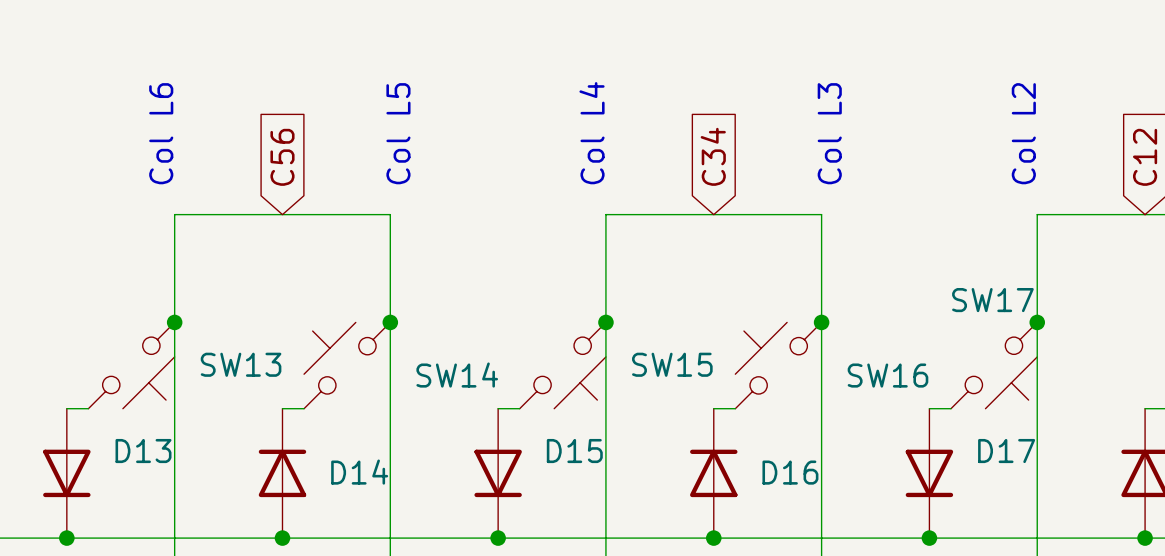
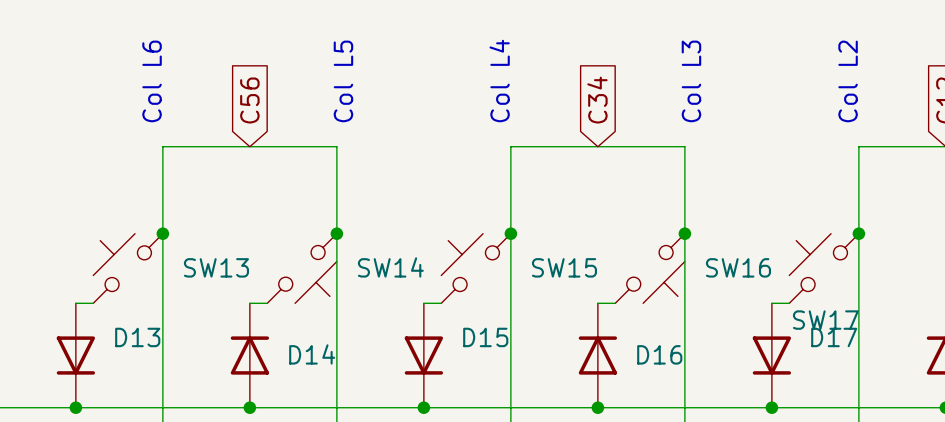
SW13 rotation: 0° (131, 365) -> 180° (128, 268)
SW14 rotation: 0° (347, 365) -> 180° (302, 268)
SW15 rotation: 0° (562, 365) -> 180° (476, 268)
SW16 rotation: 0° (778, 365) -> 180° (650, 268)
SW17 rotation: 0° (994, 365) -> 180° (824, 268)

